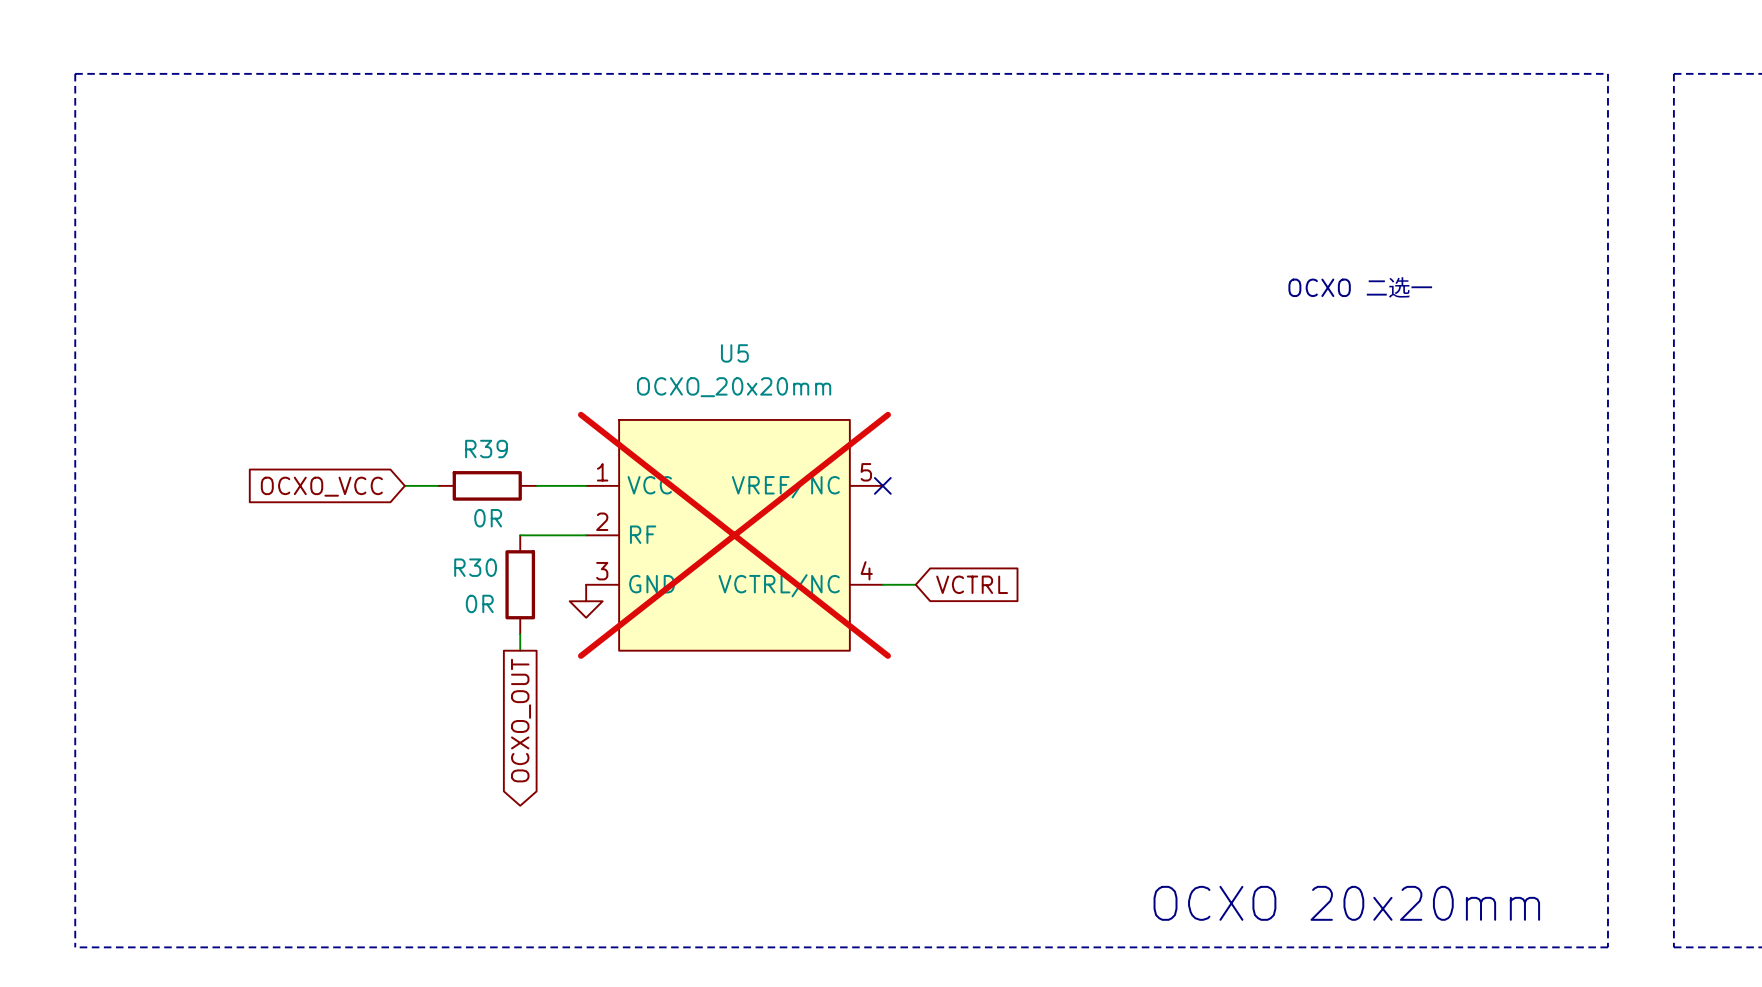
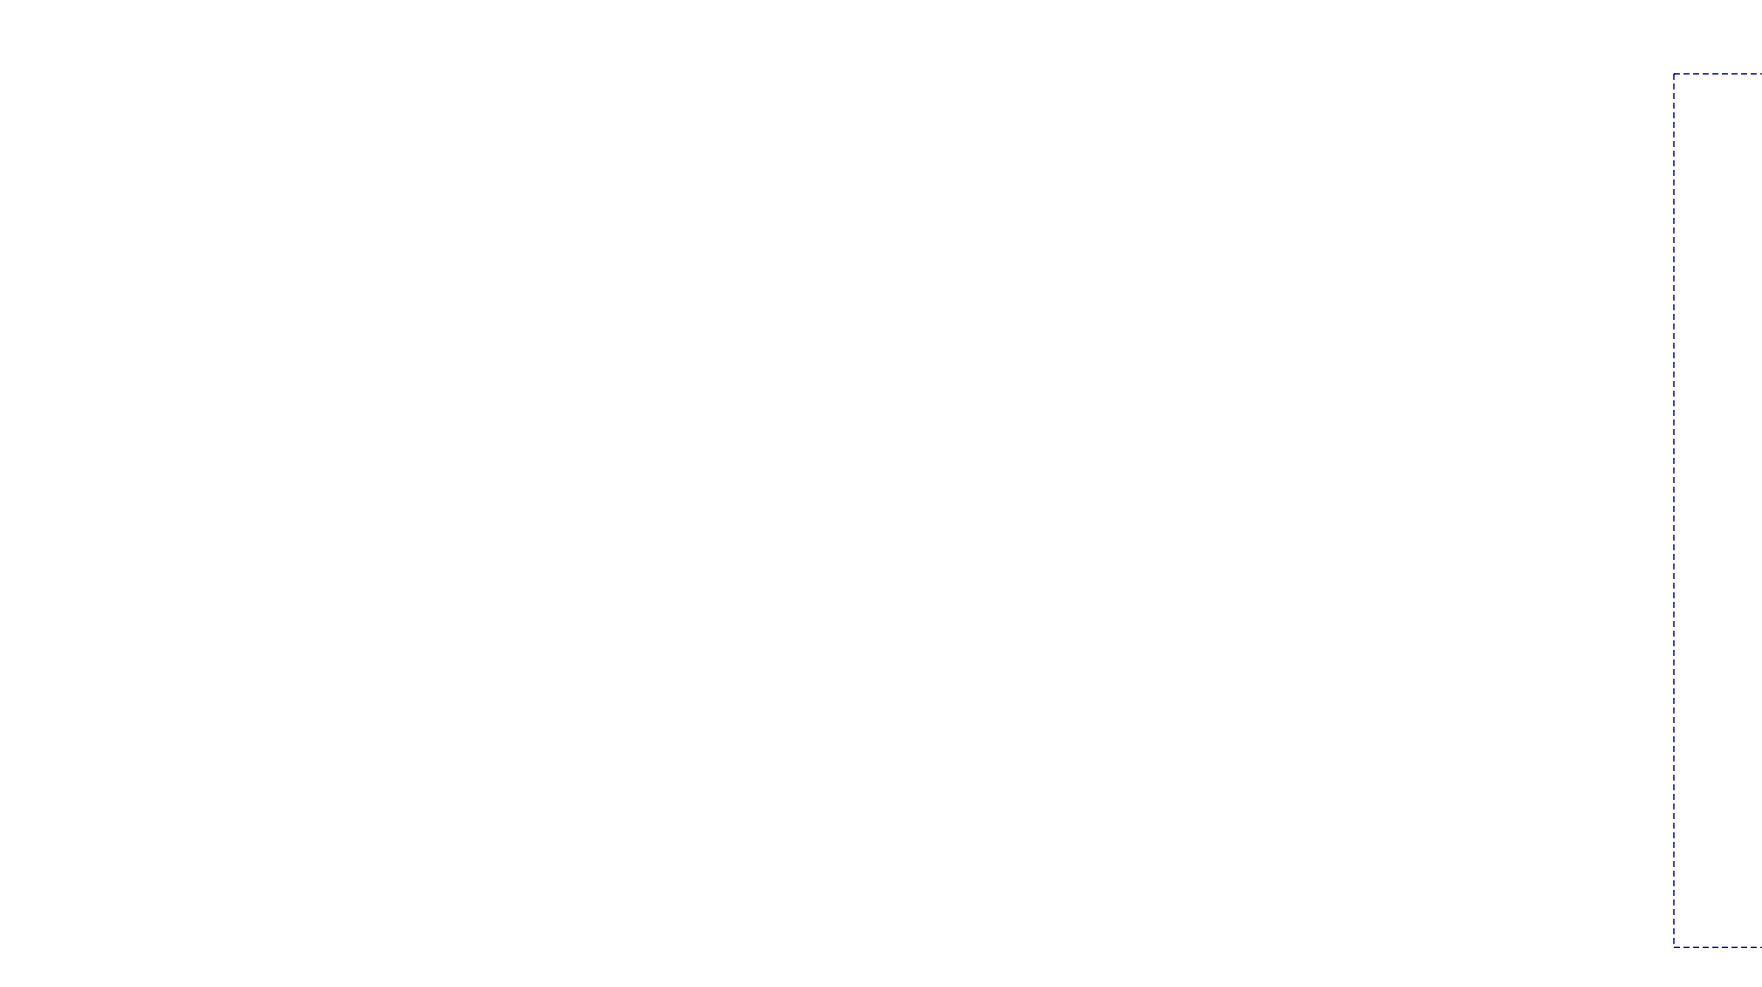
line: (75, 73) (1607, 73) (1607, 947) (75, 947) (75, 73) -> none
text: OCXO 二选一 (1360, 287) -> none
wire: (404, 485) (437, 485) -> none
R39: 0R (487, 485) -> none
wire: (536, 485) (586, 485) -> none
no-connect mark: (882, 485) -> none
global label: OCXO_VCC (321, 486) -> none
wire: (520, 535) (586, 535) -> none
U5: OCXO_20x20mm (734, 535) -> none
R30: 0R (520, 584) -> none
wire: (882, 584) (915, 584) -> none
global label: VCTRL (972, 584) -> none
power symbol: (586, 601) -> none
wire: (520, 634) (520, 650) -> none
global label: OCXO_OUT (521, 720) -> none
text: OCXO 20x20mm (1346, 903) -> none

